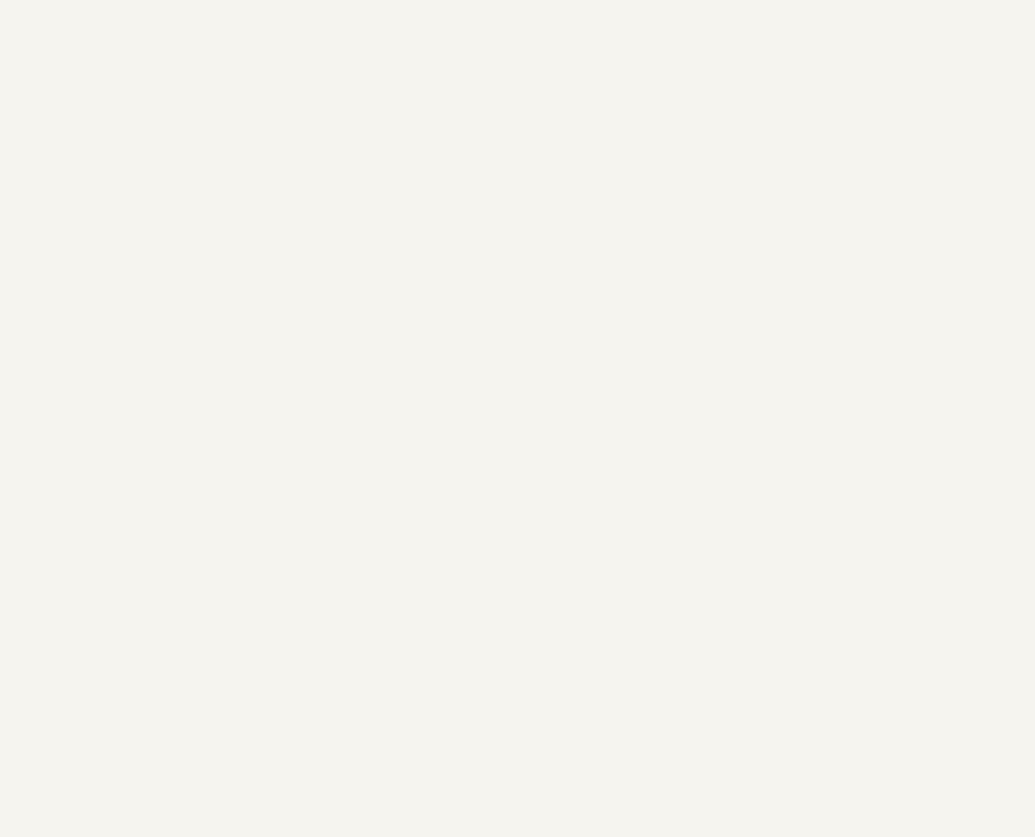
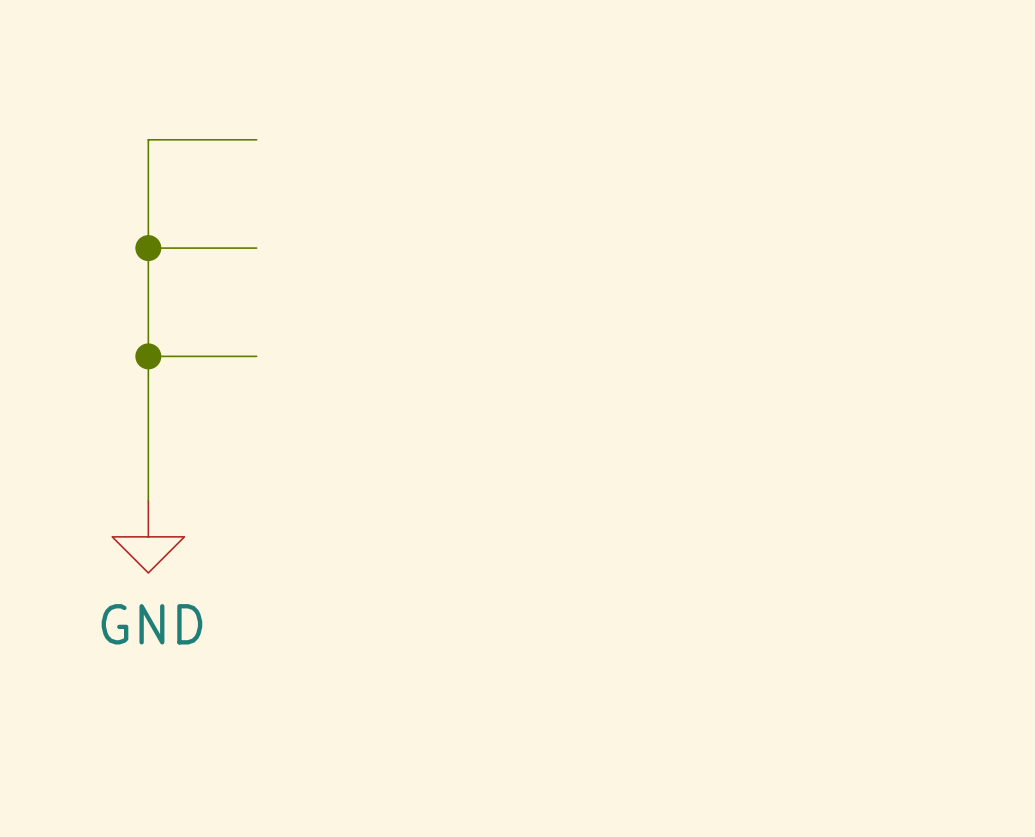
wire: none -> (256, 139) (148, 139) (148, 500)
wire: none -> (148, 248) (256, 248)
junction: none -> (148, 248)
wire: none -> (148, 356) (256, 356)
junction: none -> (148, 356)
power symbol: none -> GND (148, 536)

